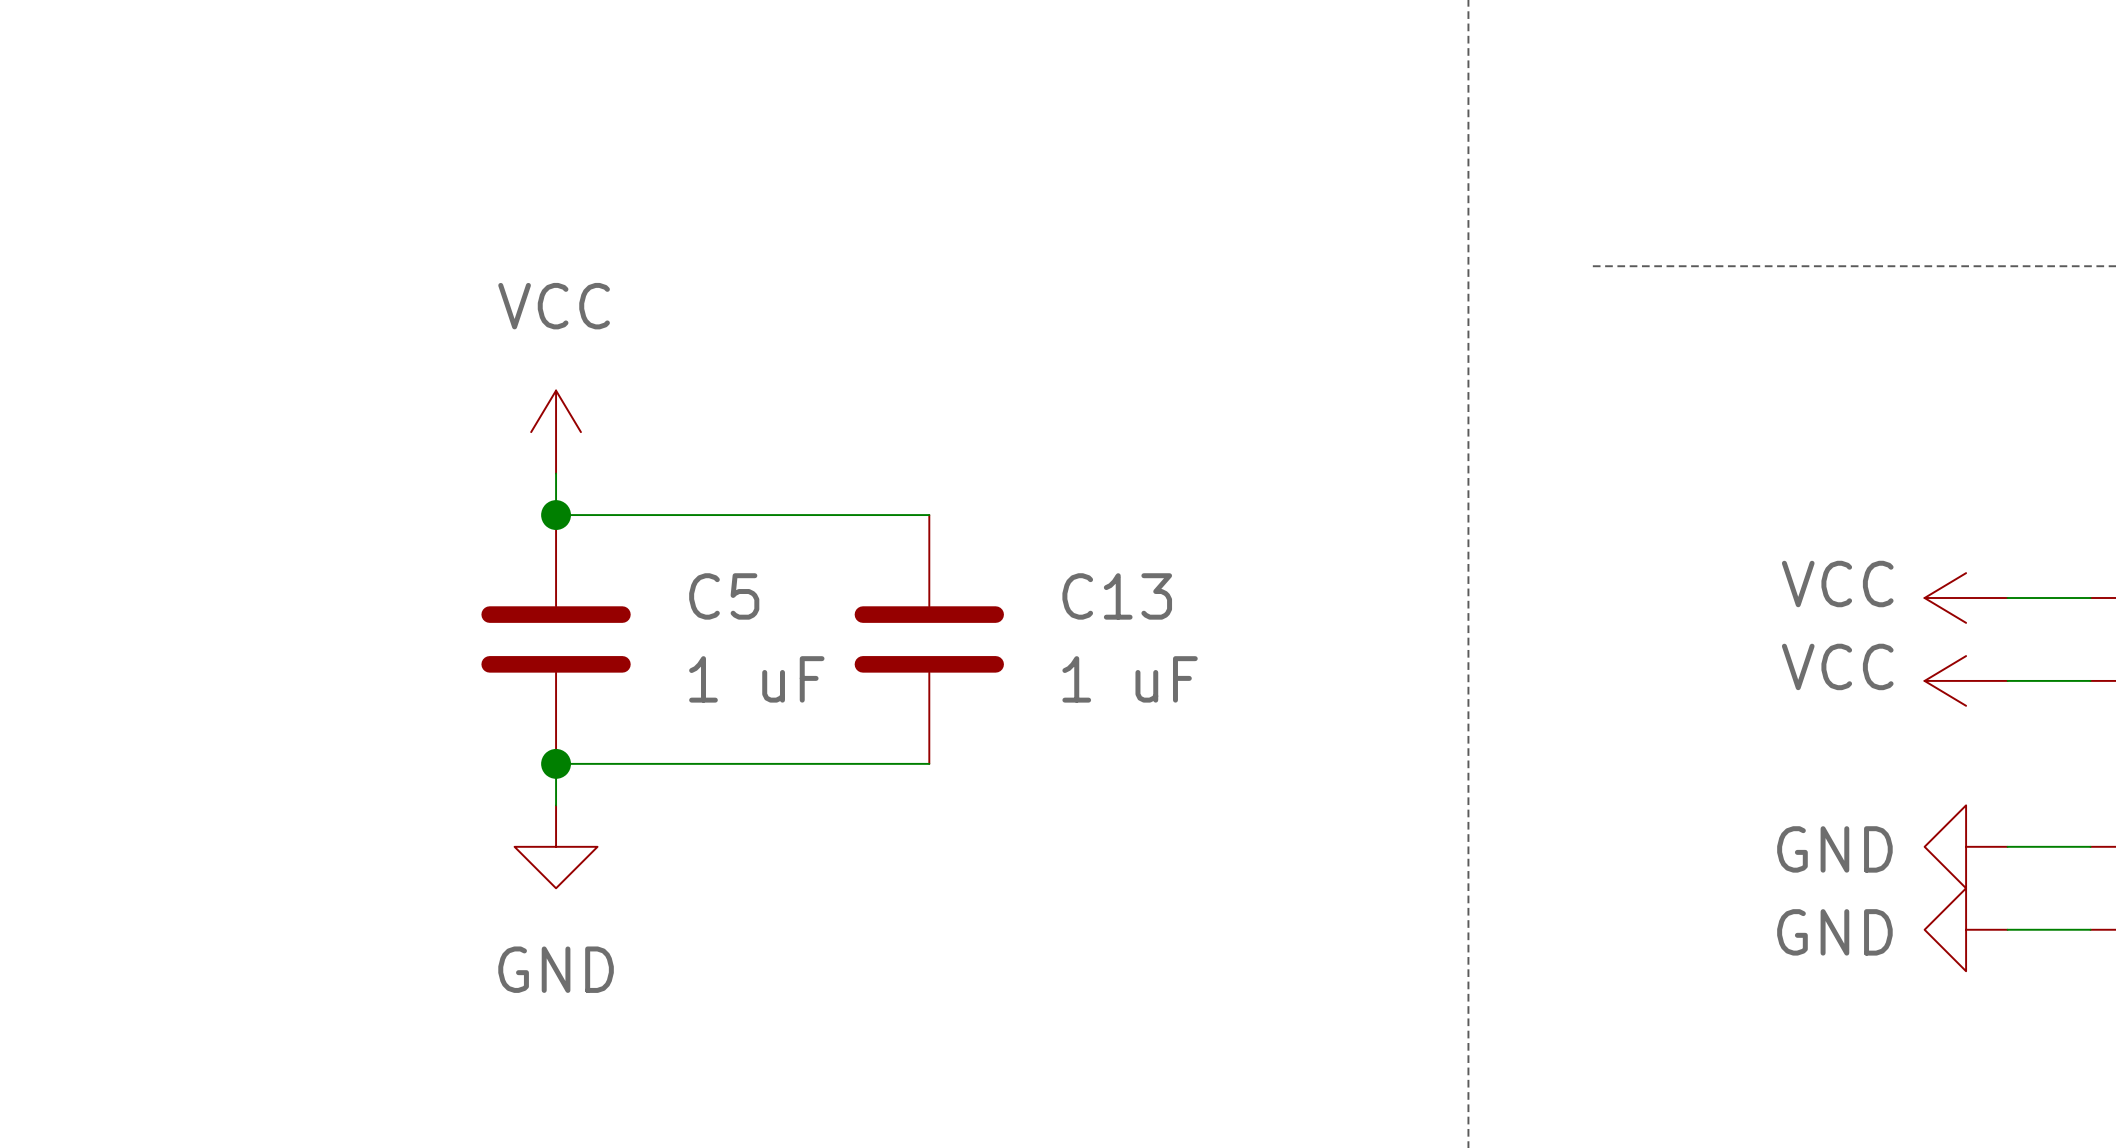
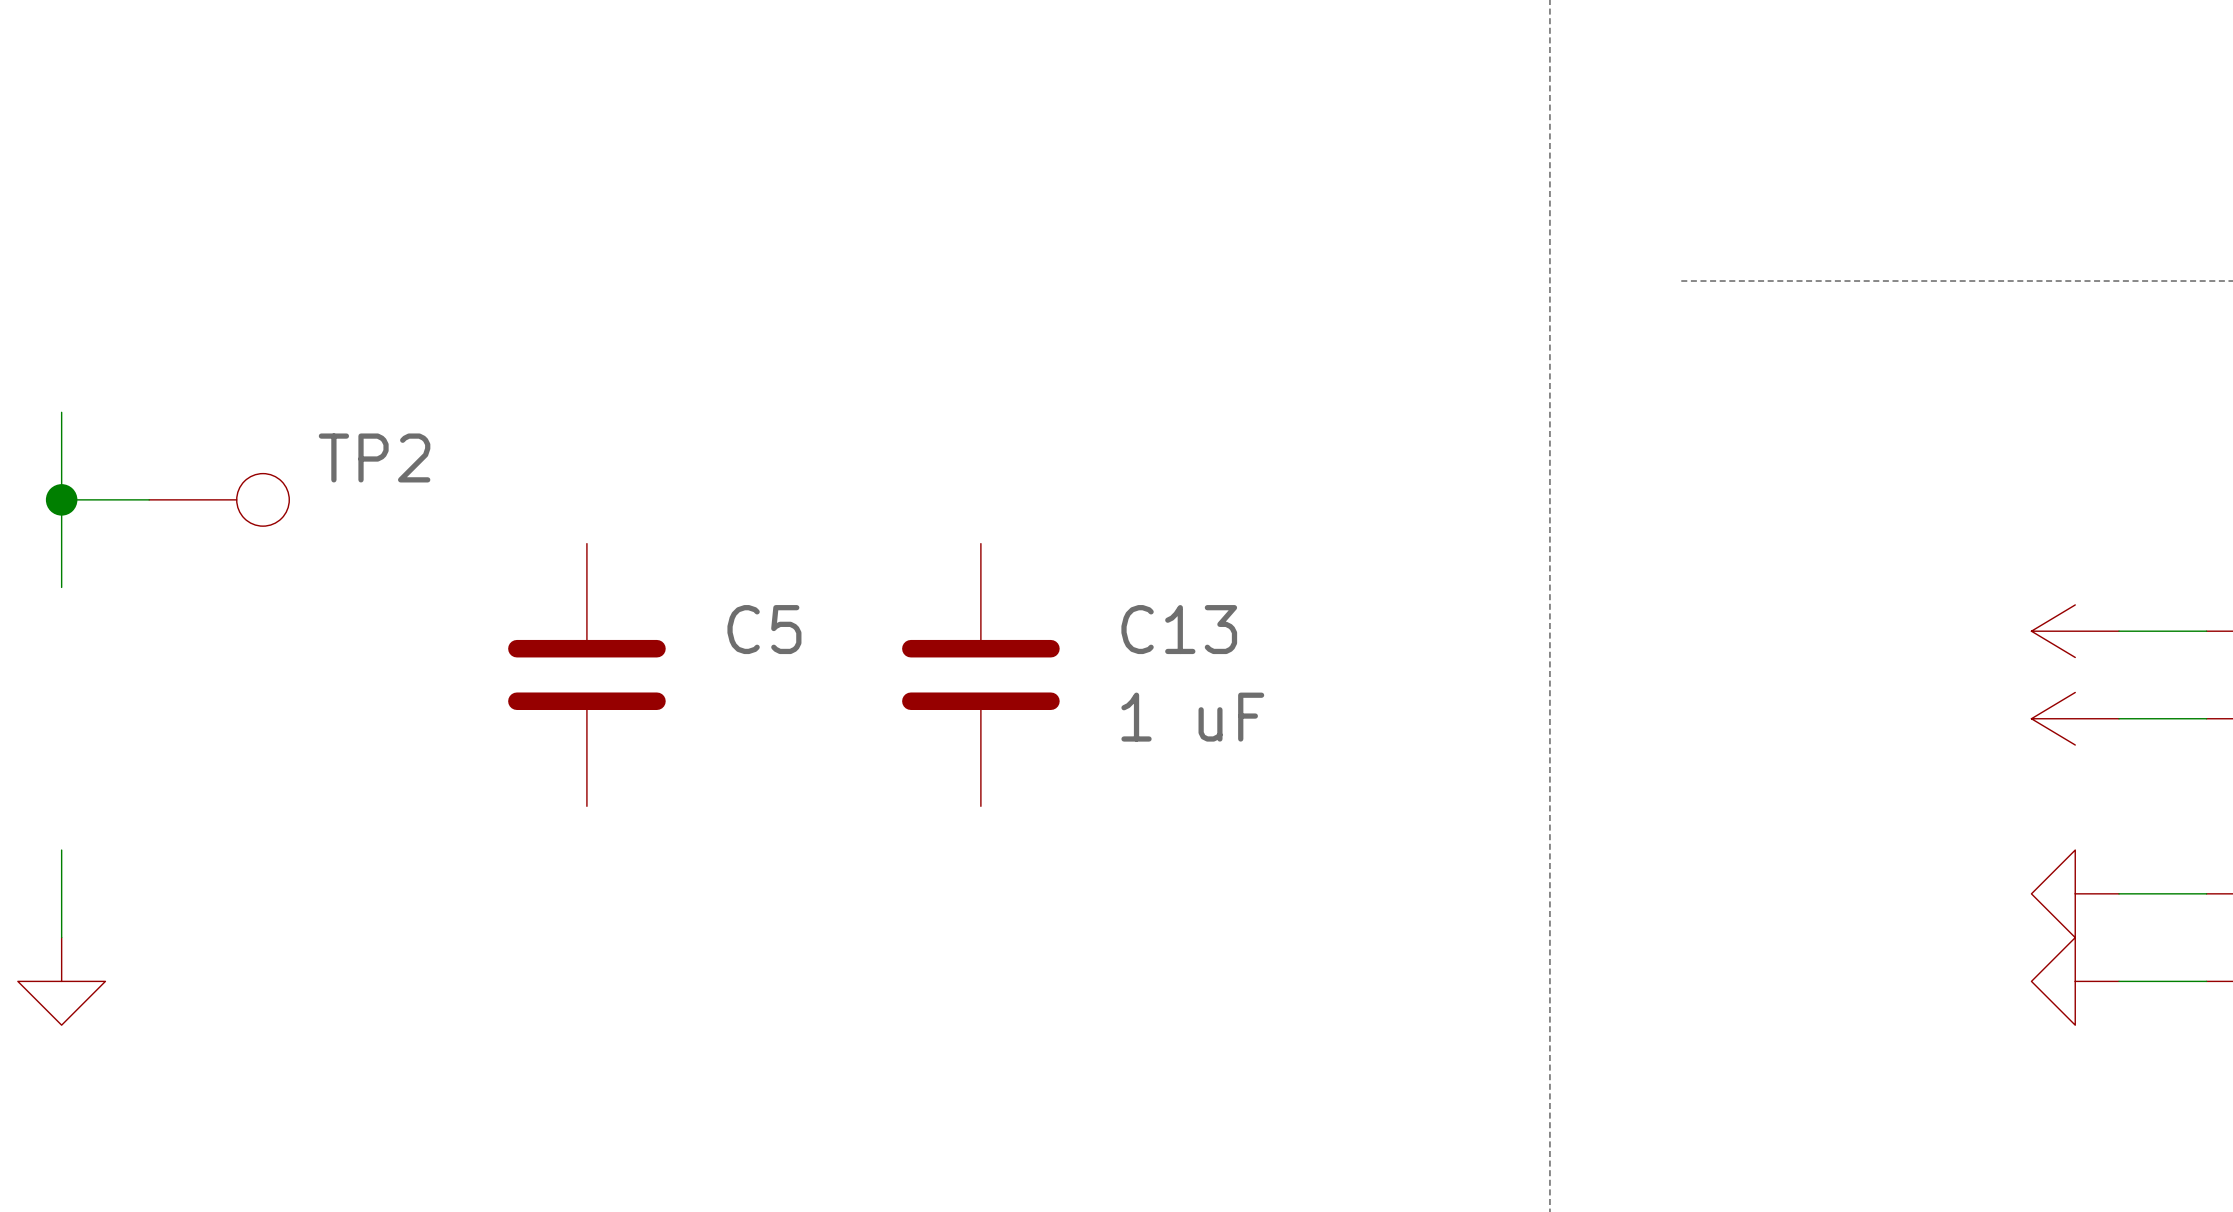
wire: none -> (61, 412) (61, 587)
power symbol: VCC (556, 432) -> none
wire: none -> (61, 499) (149, 499)
junction: none -> (61, 499)
TP2: none -> (219, 499)
wire: (556, 473) (556, 515) (929, 515) -> none
junction: (556, 515) -> none
power symbol text: VCC (1837, 584) -> none
power symbol text: VCC (1837, 666) -> none
C5 value: 1 uF (756, 679) -> none
junction: (556, 763) -> none
wire: (929, 763) (556, 763) (556, 805) -> none
wire: none -> (61, 850) (61, 937)
power symbol: GND (556, 846) -> none
power symbol text: GND (1834, 849) -> none
power symbol: none -> (61, 981)
power symbol text: GND (1834, 932) -> none

